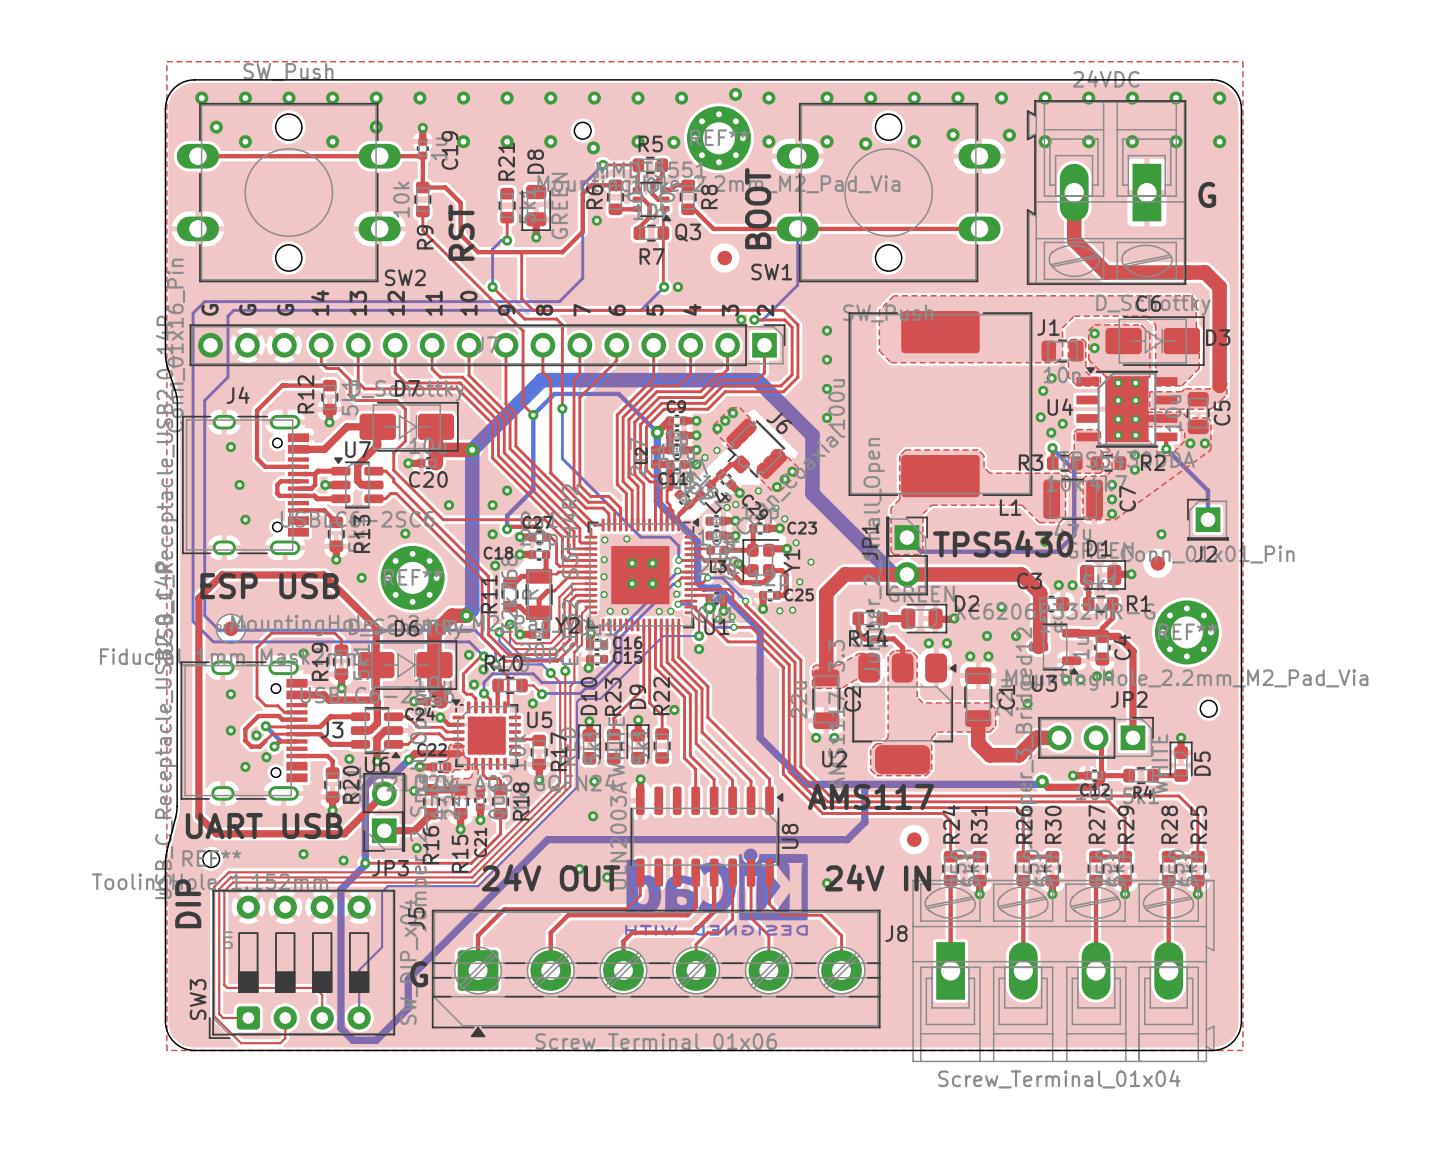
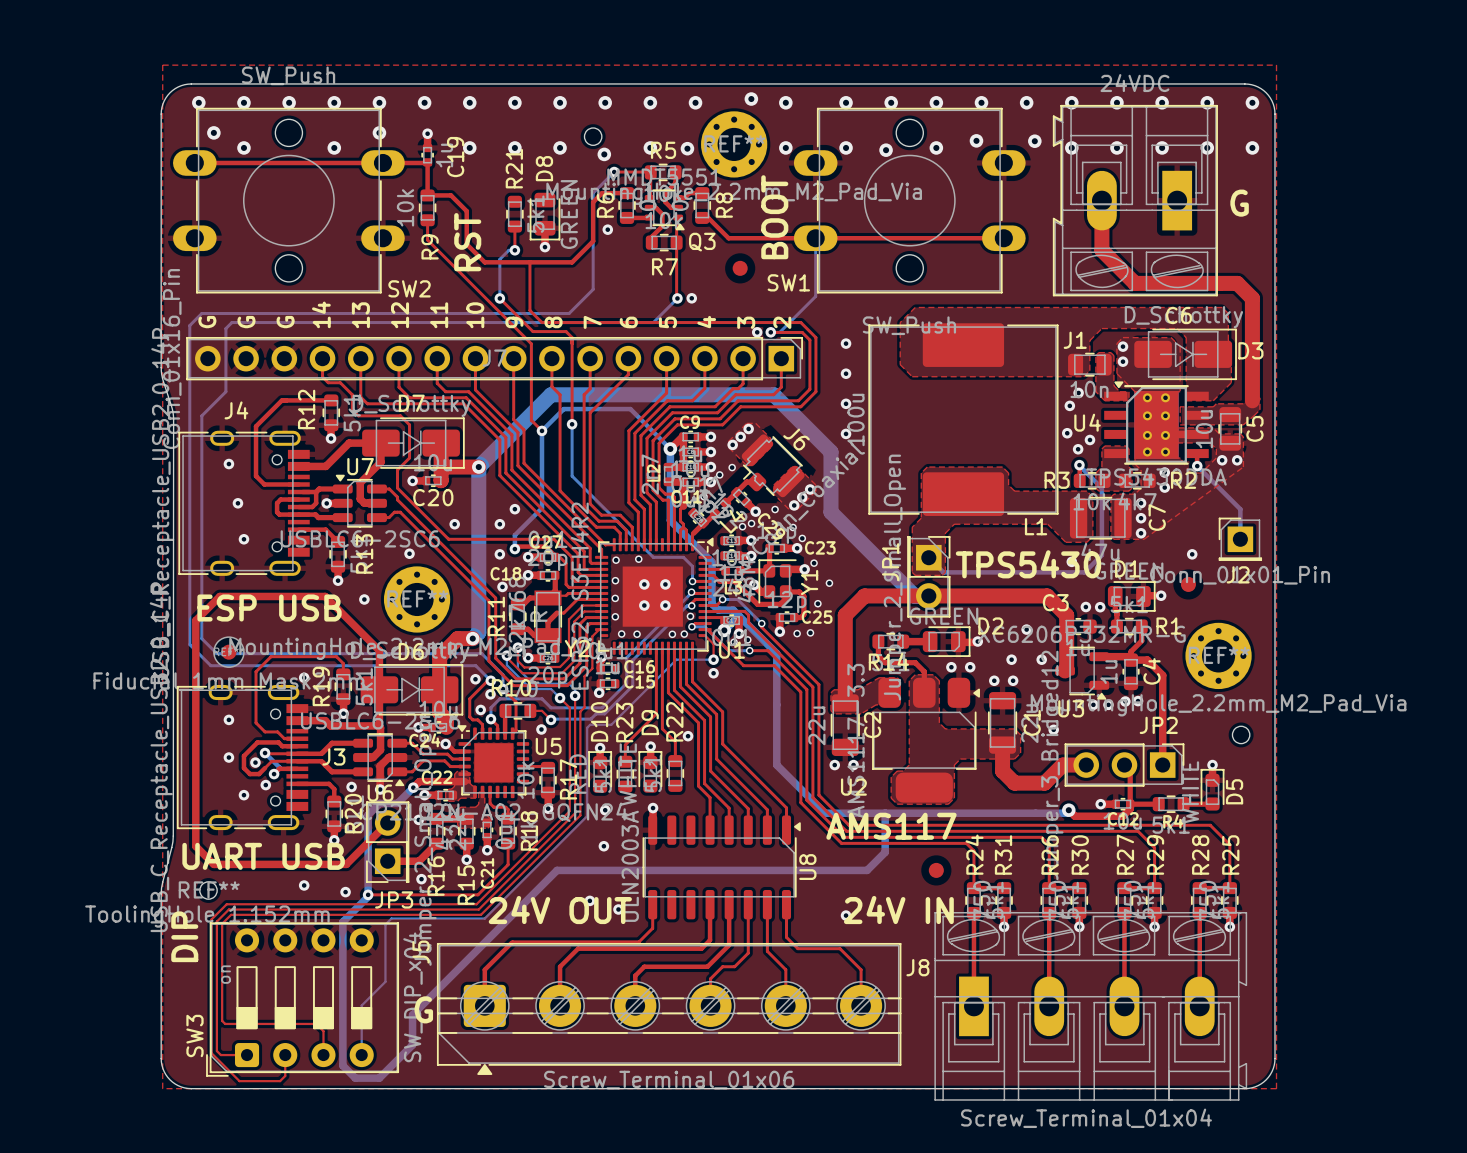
drawing: [625, 848, 808, 936] -> none

